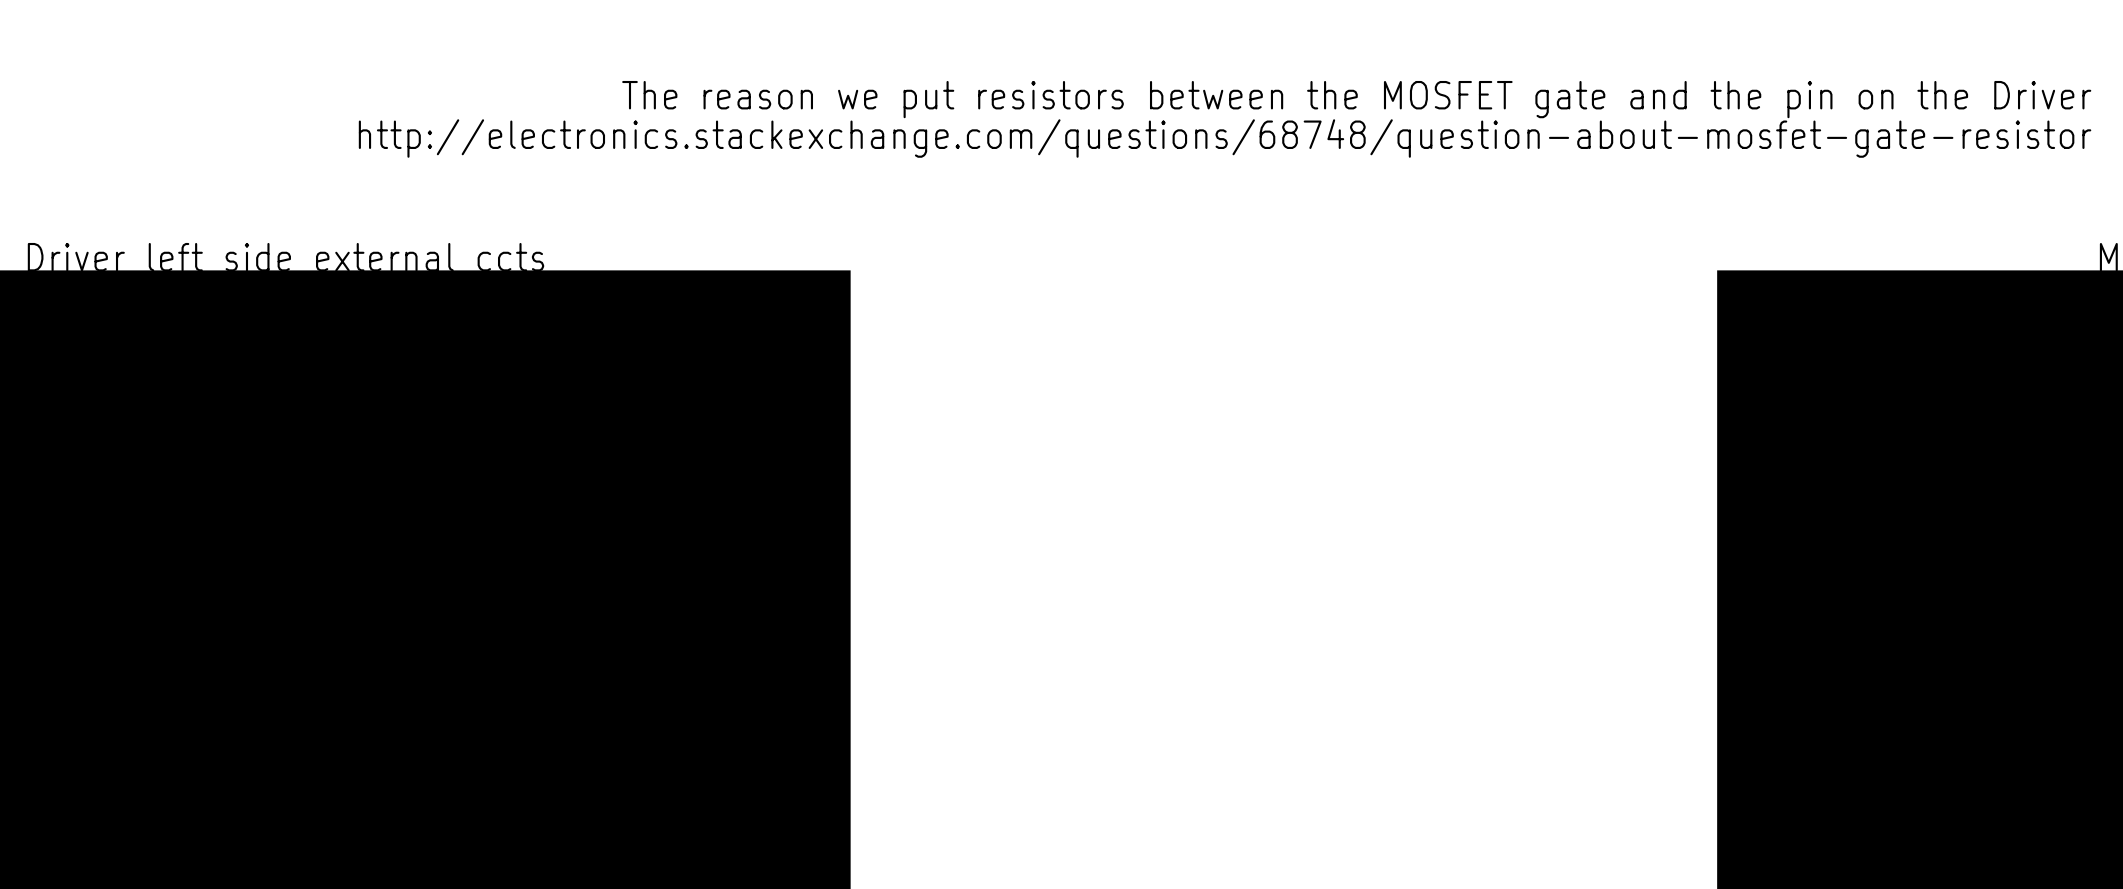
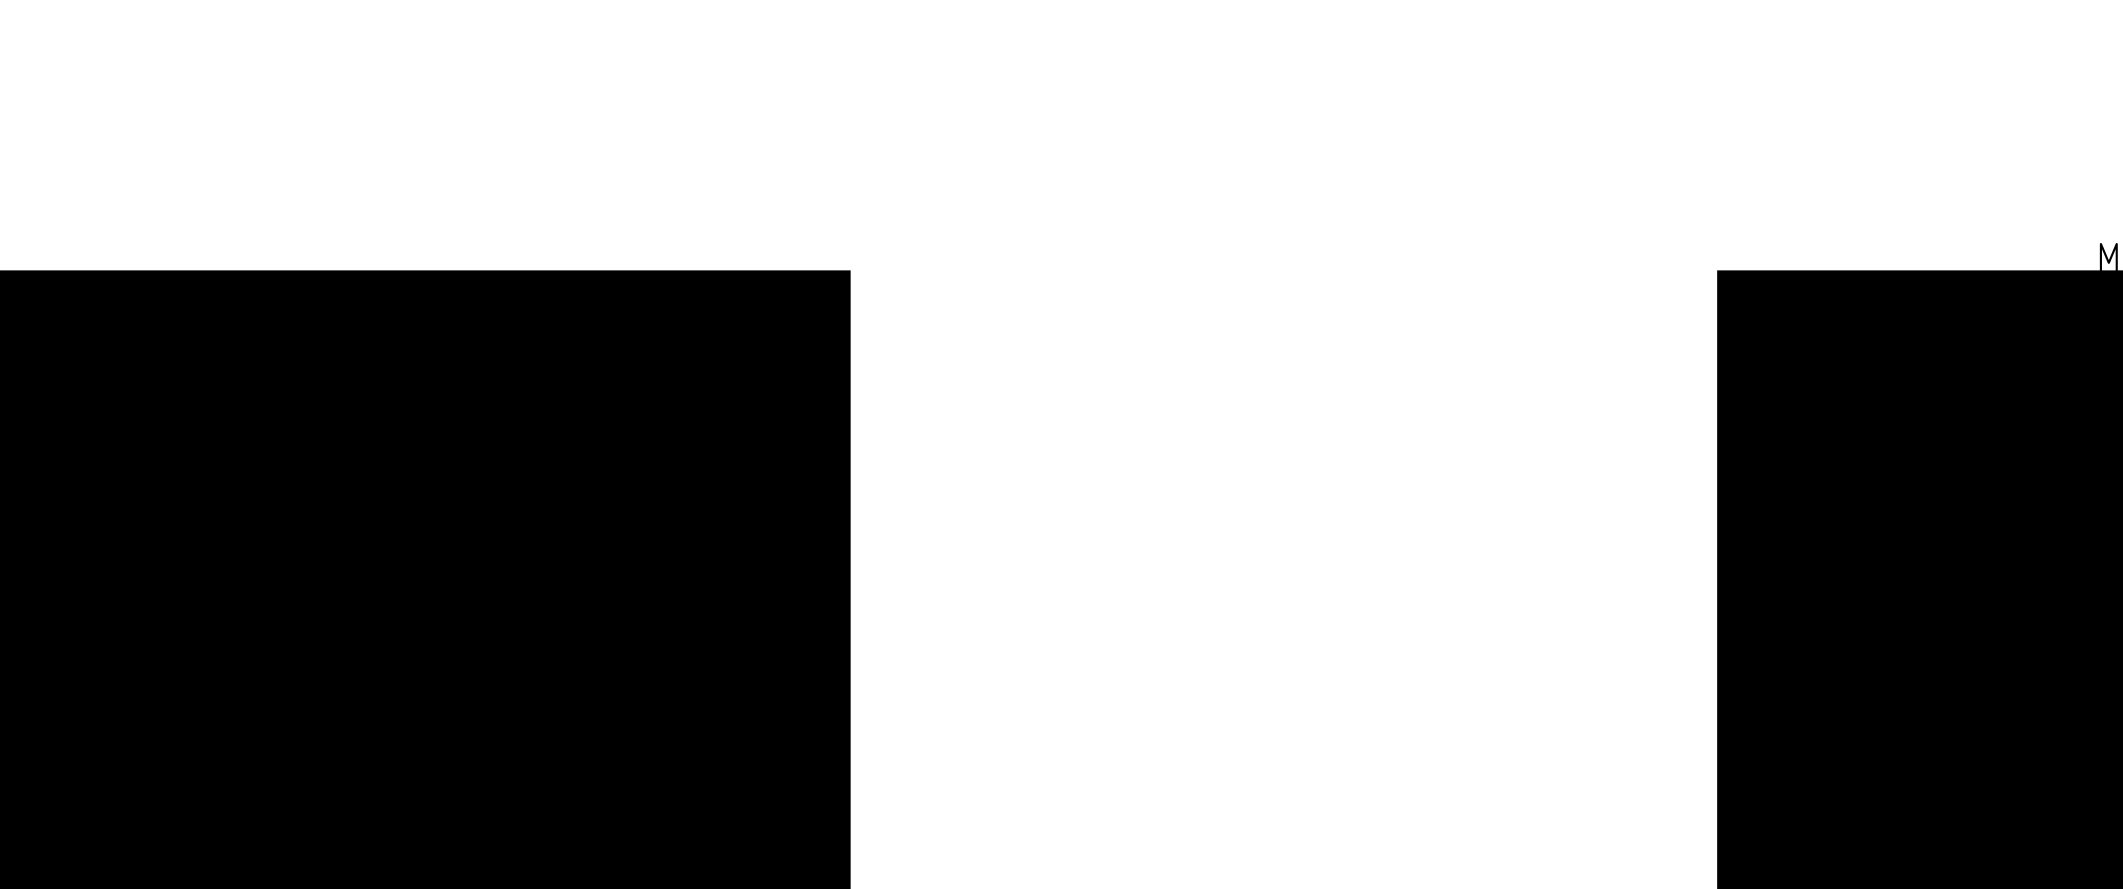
text: The reason we put resistors between the MOSFET gate and the pin on the Driver (1356, 99) -> none
text: http://electronics.stackexchange.com/questions/68748/question-about-mosfet-gate-resistor (1225, 138) -> none
text: Driver left side external ccts (285, 257) -> none

